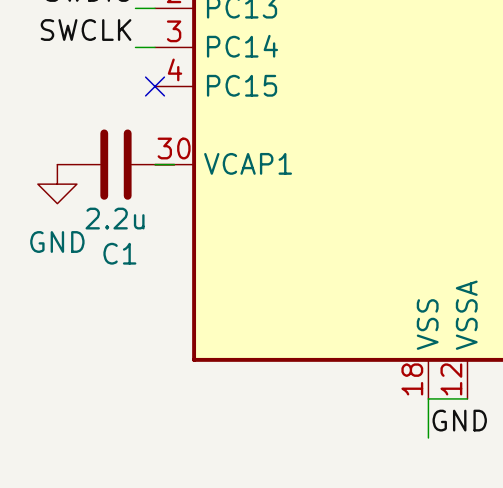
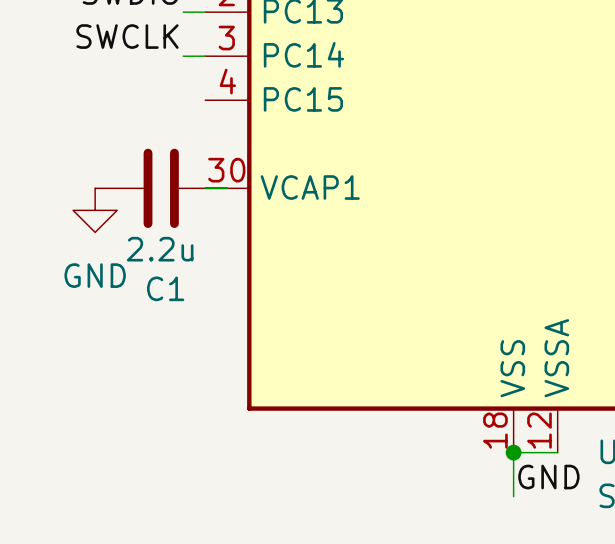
no-connect mark: (155, 86) -> none
junction: none -> (513, 452)

